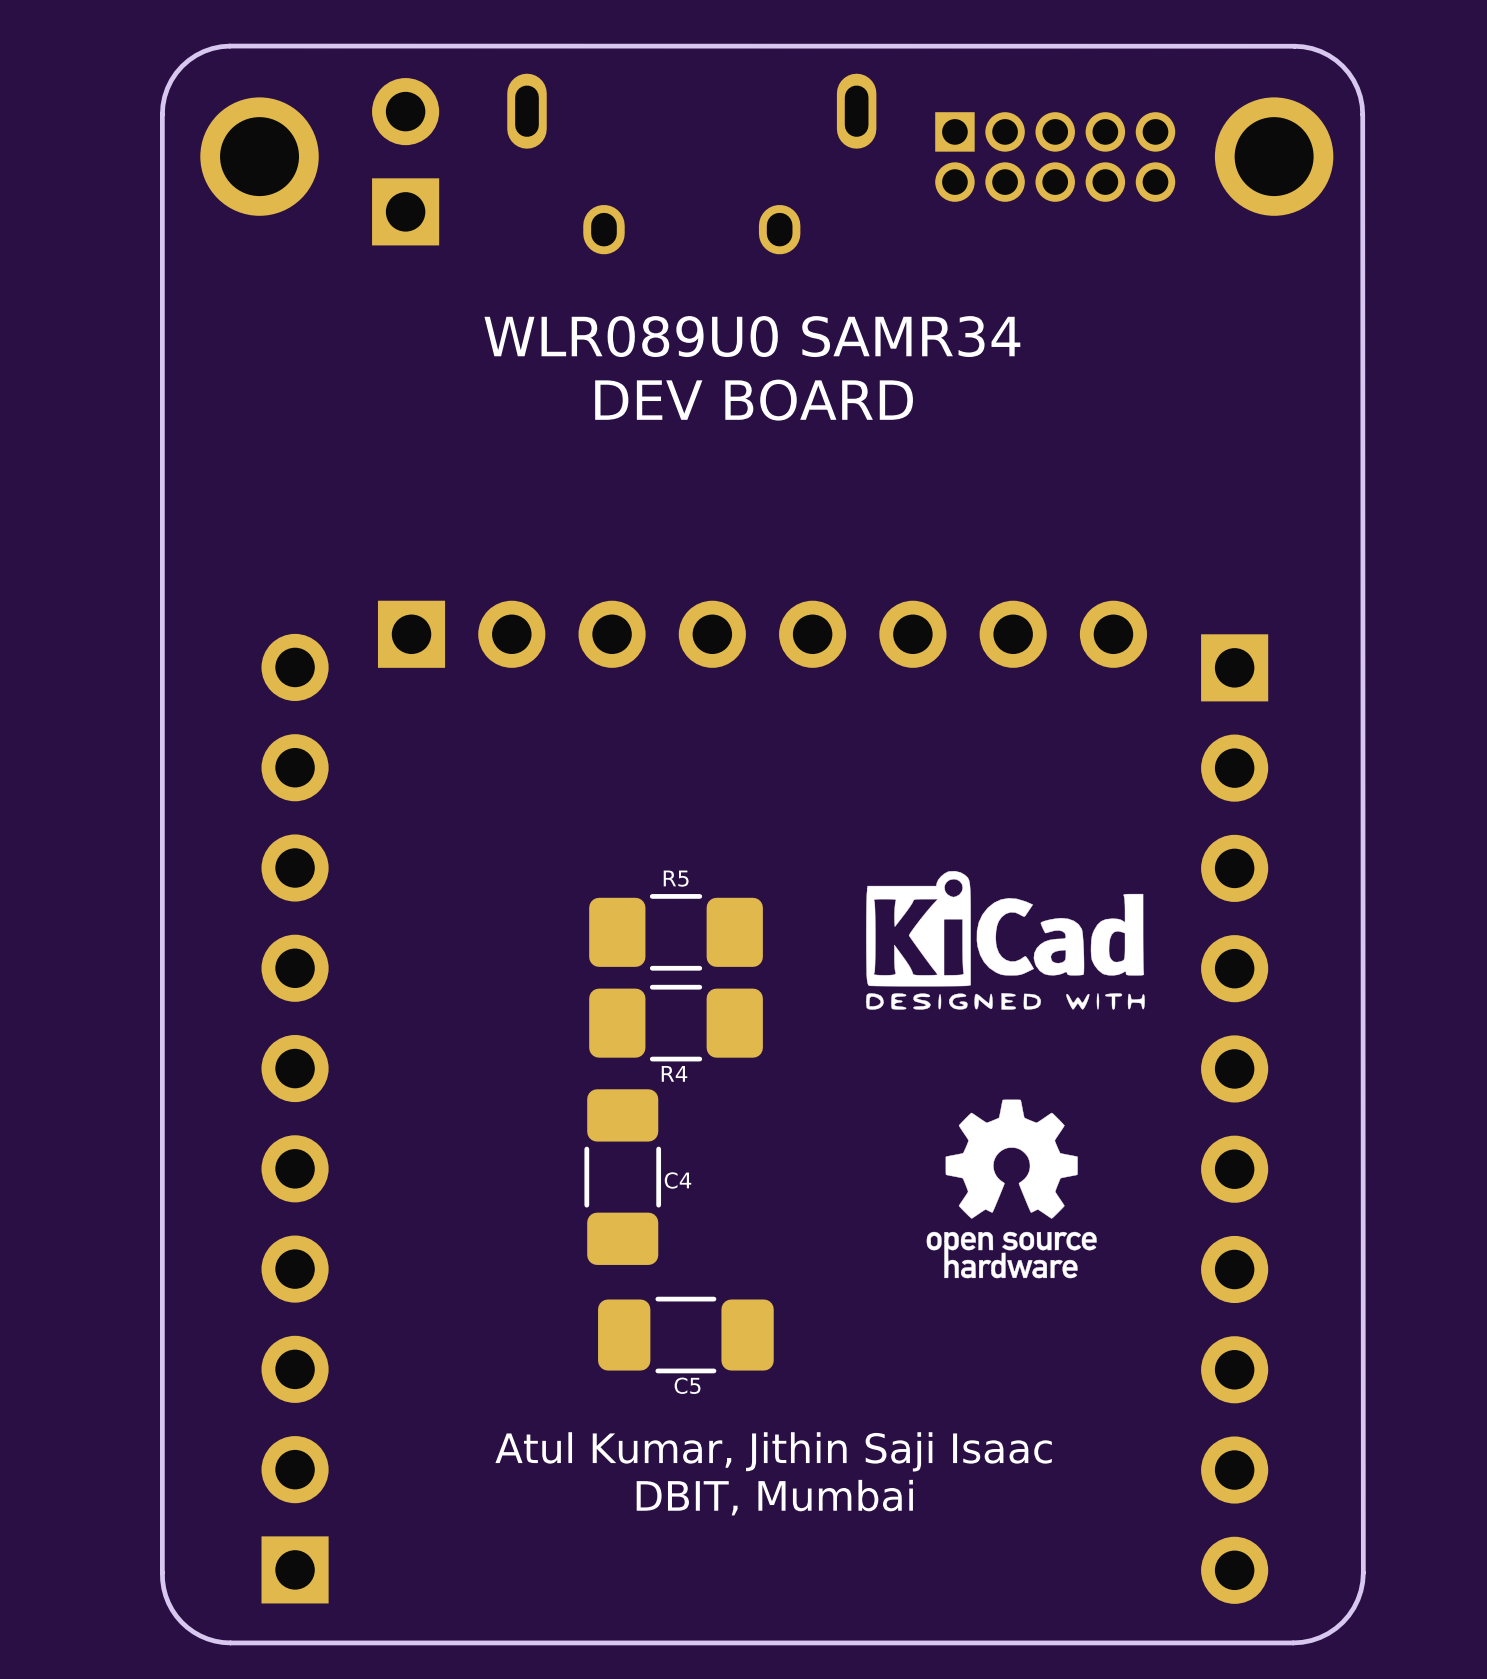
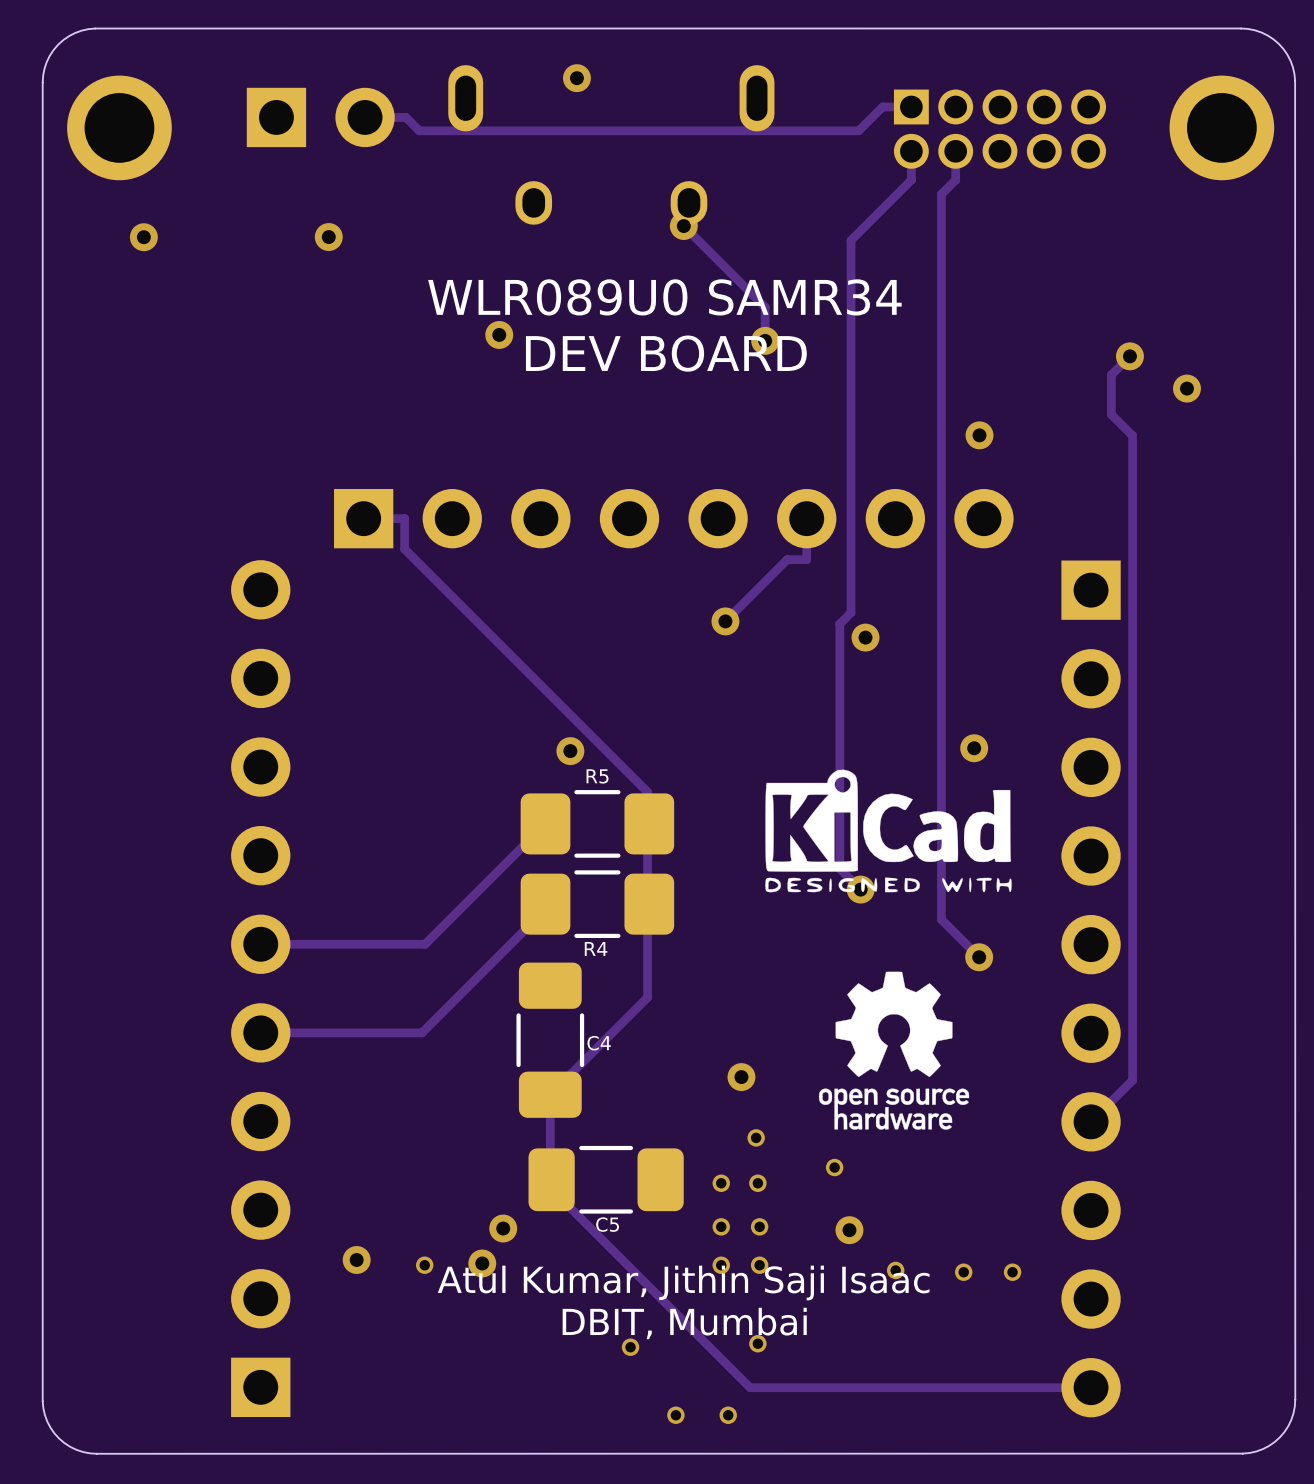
board edge: (1294, 46) (229, 46) (212, 48) (196, 55) (176, 72) (164, 96) (162, 114) (162, 1572) (165, 1595) (172, 1609) (181, 1622) (193, 1632) (207, 1638) (230, 1642) (1293, 1642) (1311, 1640) (1328, 1633) (1348, 1615) (1360, 1590) (1363, 1572) (1362, 114) (1357, 88) (1342, 66) (1320, 51) (1294, 46) -> (1241, 28) (1261, 32) (1278, 43) (1290, 60) (1295, 80) (1295, 1399) (1293, 1413) (1284, 1431) (1269, 1445) (1256, 1451) (1242, 1453) (96, 1453) (76, 1449) (64, 1443) (50, 1427) (44, 1414) (42, 1401) (42, 82) (46, 62) (53, 50) (68, 36) (81, 30) (95, 28) (1241, 28)
via: none -> (576, 78)
track: none -> (911, 106) (882, 106) (858, 130) (419, 130) (406, 117) (365, 117)
part position: (259, 156) -> (119, 127)
part position: (1055, 156) -> (1000, 129)
part position: (1274, 156) -> (1221, 127)
part rotation: 0° (405, 161) -> 90° clockwise (320, 117)
track: none -> (911, 151) (911, 180) (851, 240) (851, 612) (839, 624) (839, 868) (860, 889)
track: none -> (955, 151) (955, 180) (941, 194) (941, 919) (979, 957)
track: none -> (683, 226) (765, 307) (765, 340)
via: none -> (683, 226)
via: none -> (143, 237)
via: none -> (328, 237)
via: none -> (499, 334)
via: none -> (765, 340)
track: none -> (1129, 356) (1111, 374) (1111, 414) (1132, 435) (1132, 1080) (1091, 1121)
via: none -> (1129, 356)
via: none -> (1186, 388)
via: none -> (979, 435)
track: none -> (363, 518) (404, 518) (404, 549) (647, 792) (647, 997) (550, 1094) (550, 1171) (542, 1179) (750, 1387) (1091, 1387)
track: none -> (806, 518) (806, 559) (787, 559) (725, 621)
part position: (762, 634) -> (673, 518)
via: none -> (725, 621)
via: none -> (865, 637)
via: none -> (974, 748)
via: none -> (570, 751)
track: none -> (543, 825) (425, 944) (260, 944)
via: none -> (860, 889)
track: none -> (543, 911) (422, 1032) (260, 1032)
via: none -> (979, 957)
via: none -> (741, 1077)
via: none -> (756, 1137)
via: none -> (834, 1167)
via: none -> (721, 1183)
via: none -> (757, 1183)
via: none -> (721, 1226)
via: none -> (759, 1226)
via: none -> (503, 1228)
via: none -> (849, 1230)
via: none -> (356, 1260)
via: none -> (482, 1263)
via: none -> (424, 1265)
via: none -> (721, 1265)
via: none -> (759, 1265)
via: none -> (895, 1270)
via: none -> (963, 1272)
via: none -> (1012, 1272)
via: none -> (757, 1343)
via: none -> (630, 1347)
via: none -> (675, 1415)
via: none -> (728, 1415)

